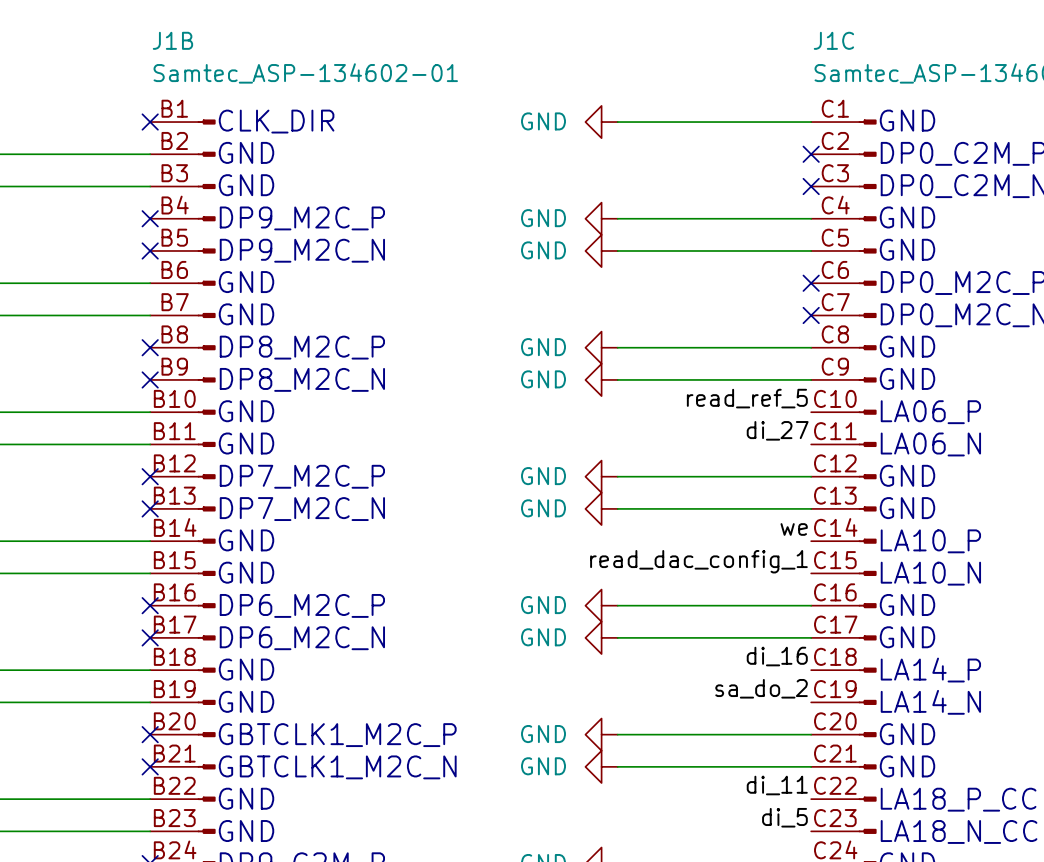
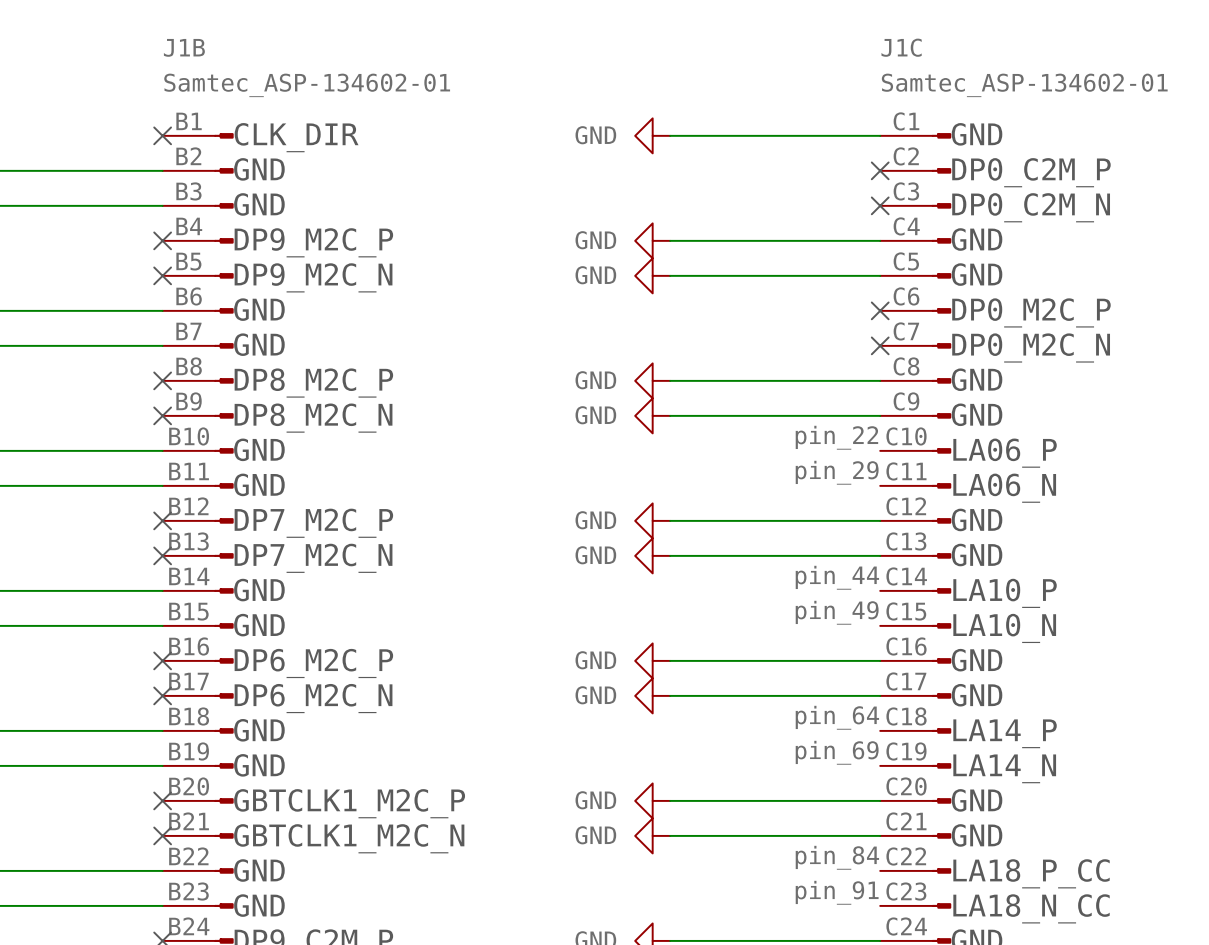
label: read_ref_5 (747, 398) -> pin_22 (836, 437)
label: di_27 (777, 430) -> pin_29 (837, 472)
label: we (794, 529) -> pin_44 (837, 577)
label: read_dac_config_1 (698, 561) -> pin_49 (837, 612)
label: di_16 (777, 656) -> pin_64 (837, 717)
label: sa_do_2 (761, 688) -> pin_69 (837, 752)
label: di_11 (777, 785) -> pin_84 (837, 857)
label: di_5 (784, 817) -> pin_91 (837, 892)

